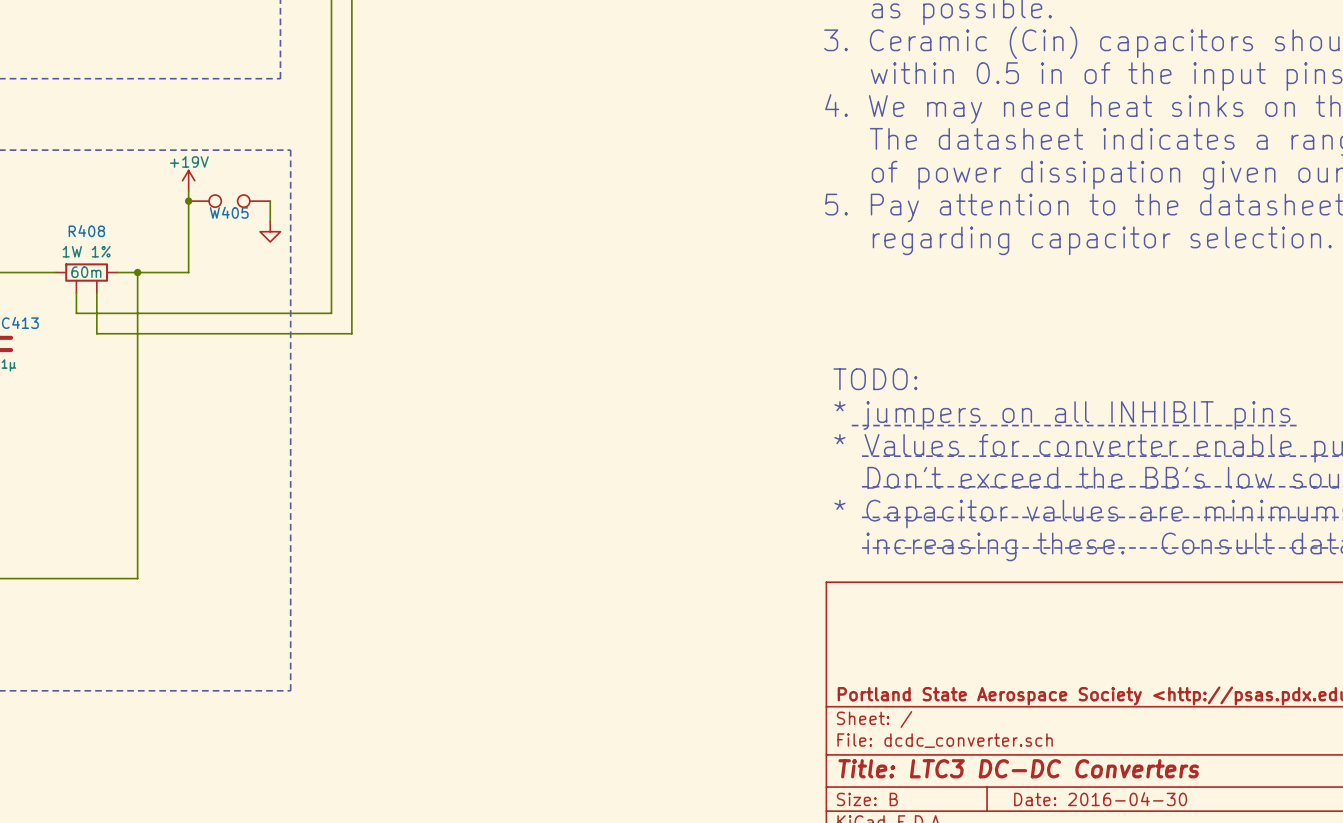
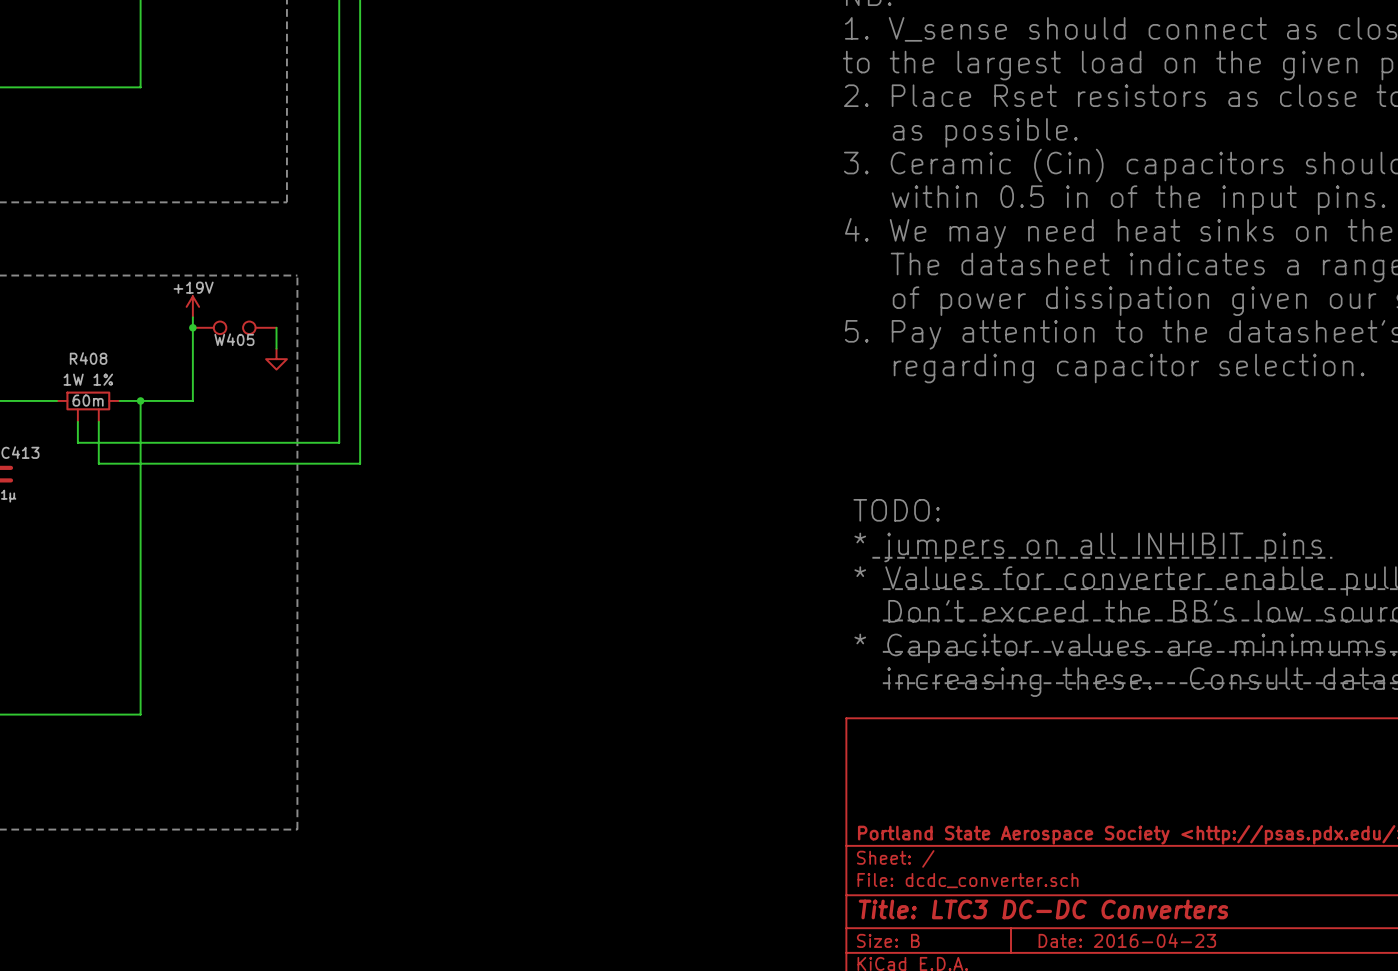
title block: Date: 2016-04-30 (1100, 799) -> Date: 2016-04-23 (1127, 940)

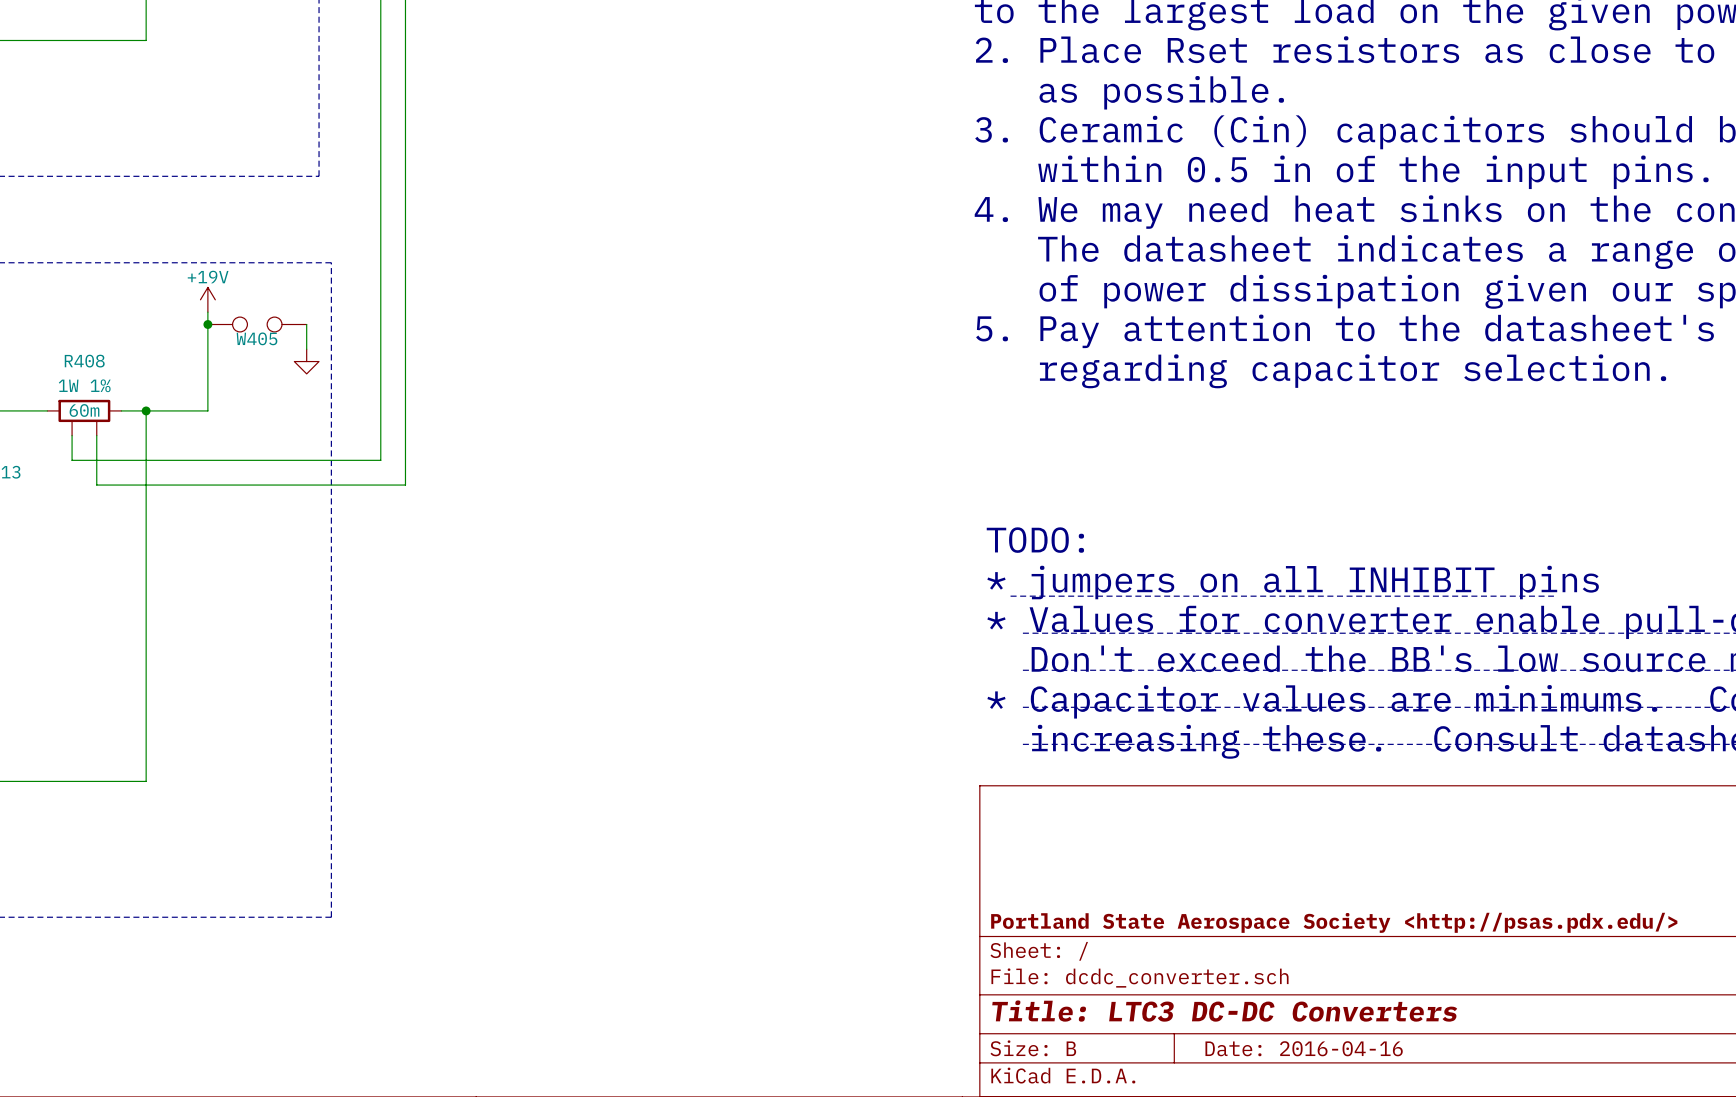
title block: Date: 2016-04-23 (1127, 940) -> Date: 2016-04-16 (1304, 1048)

